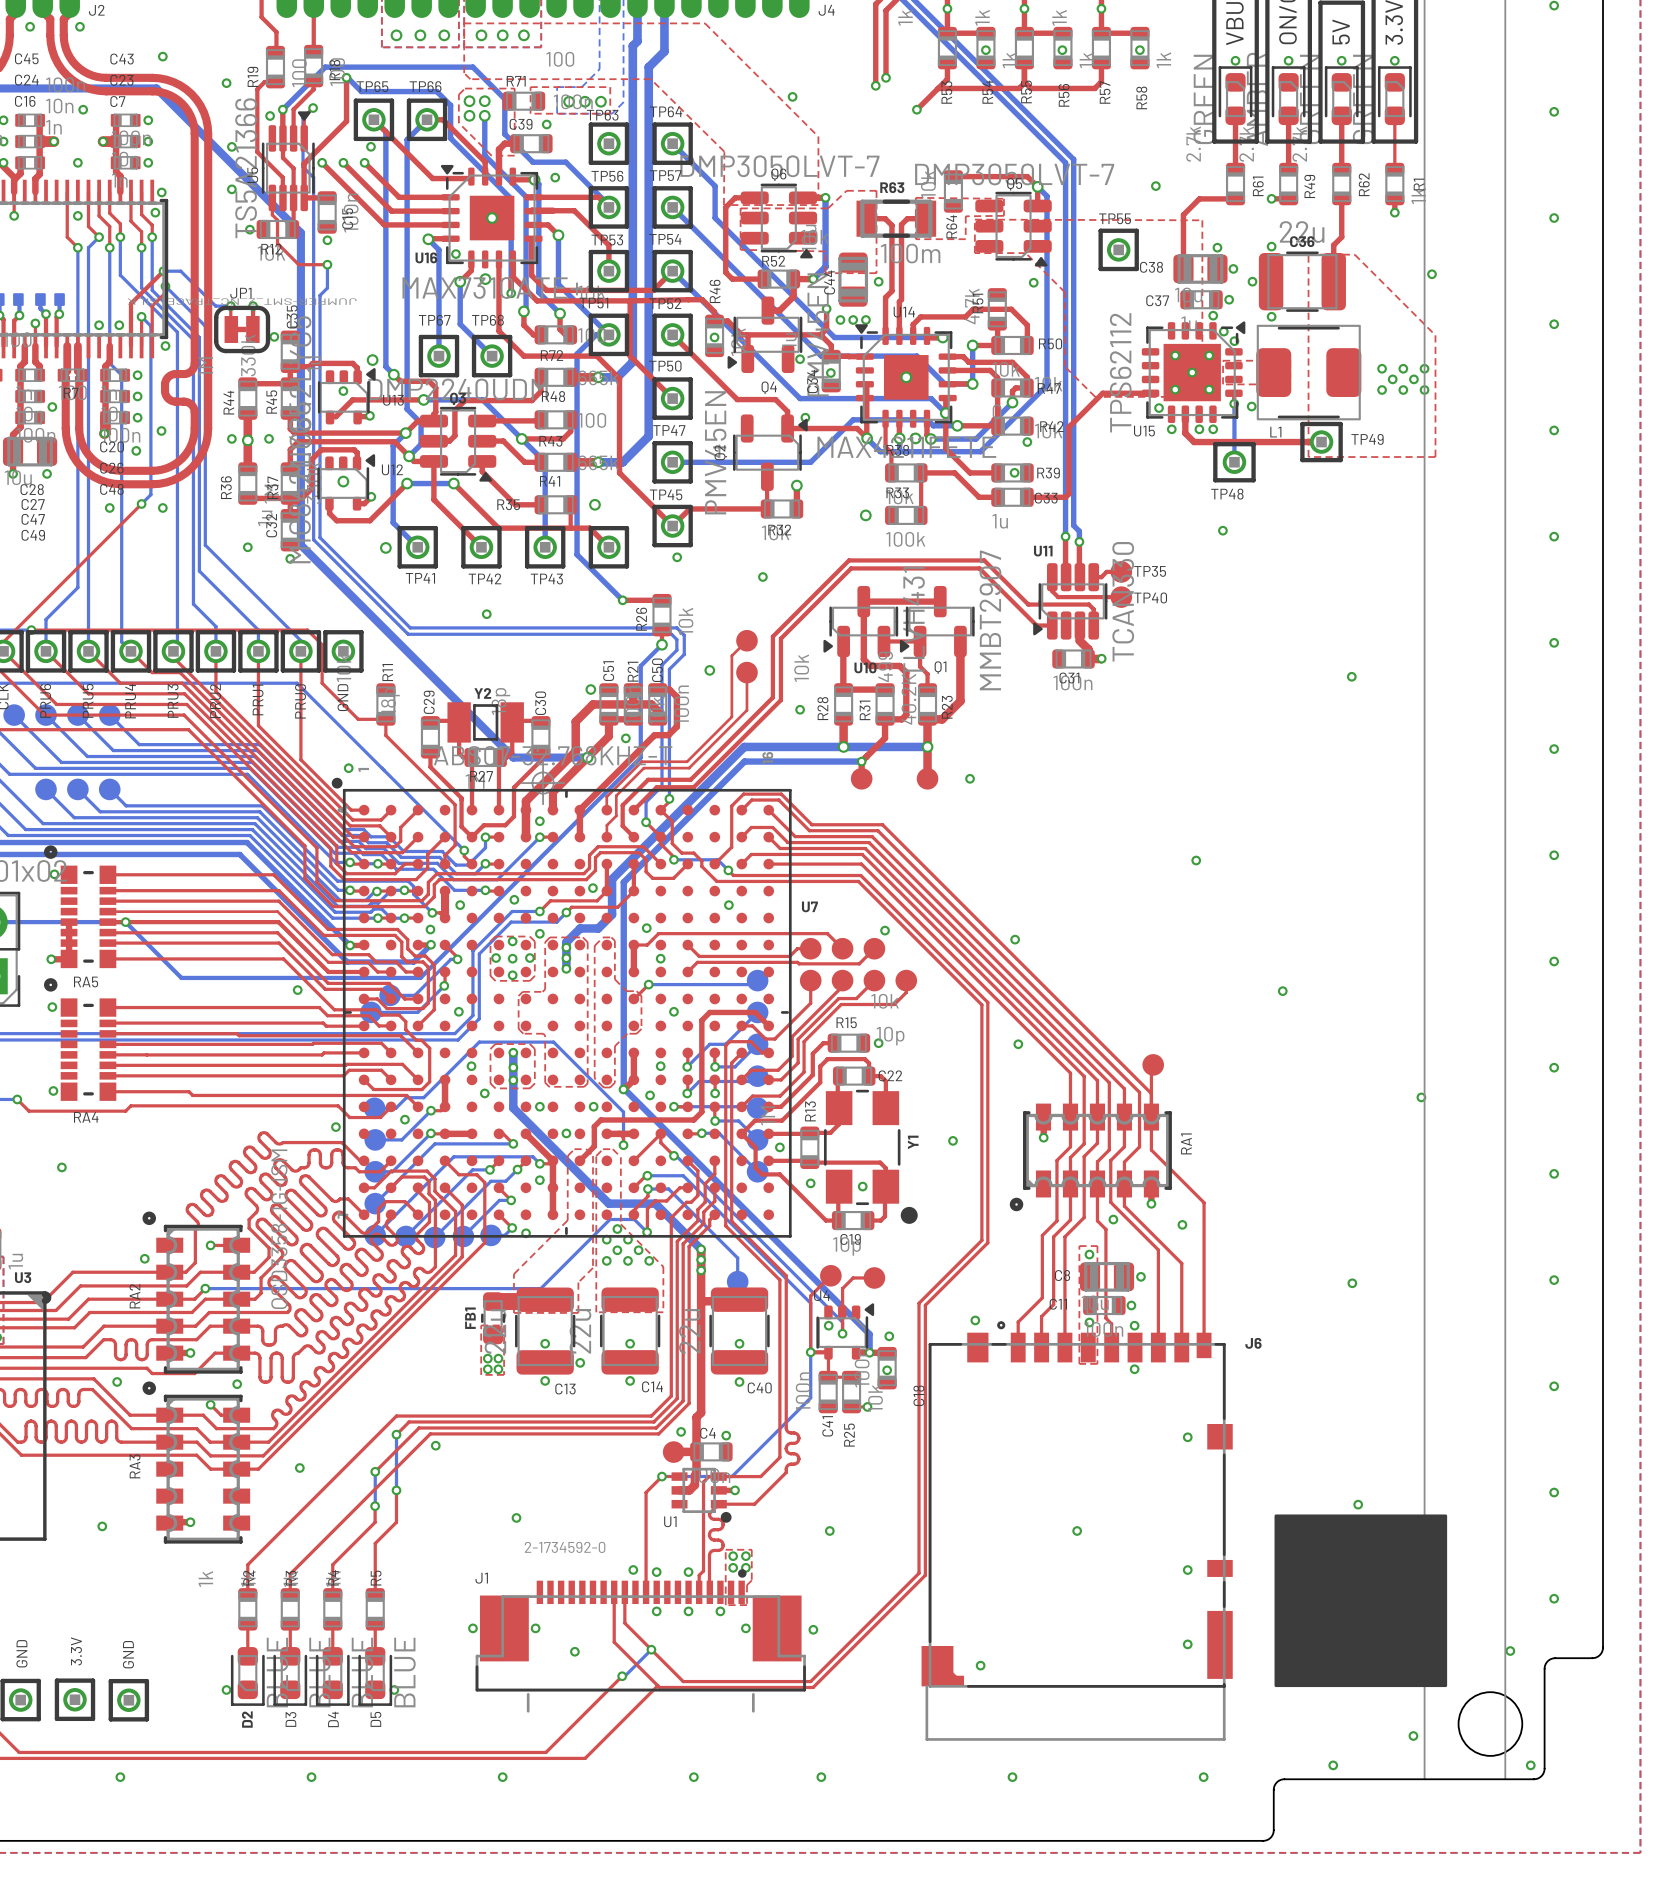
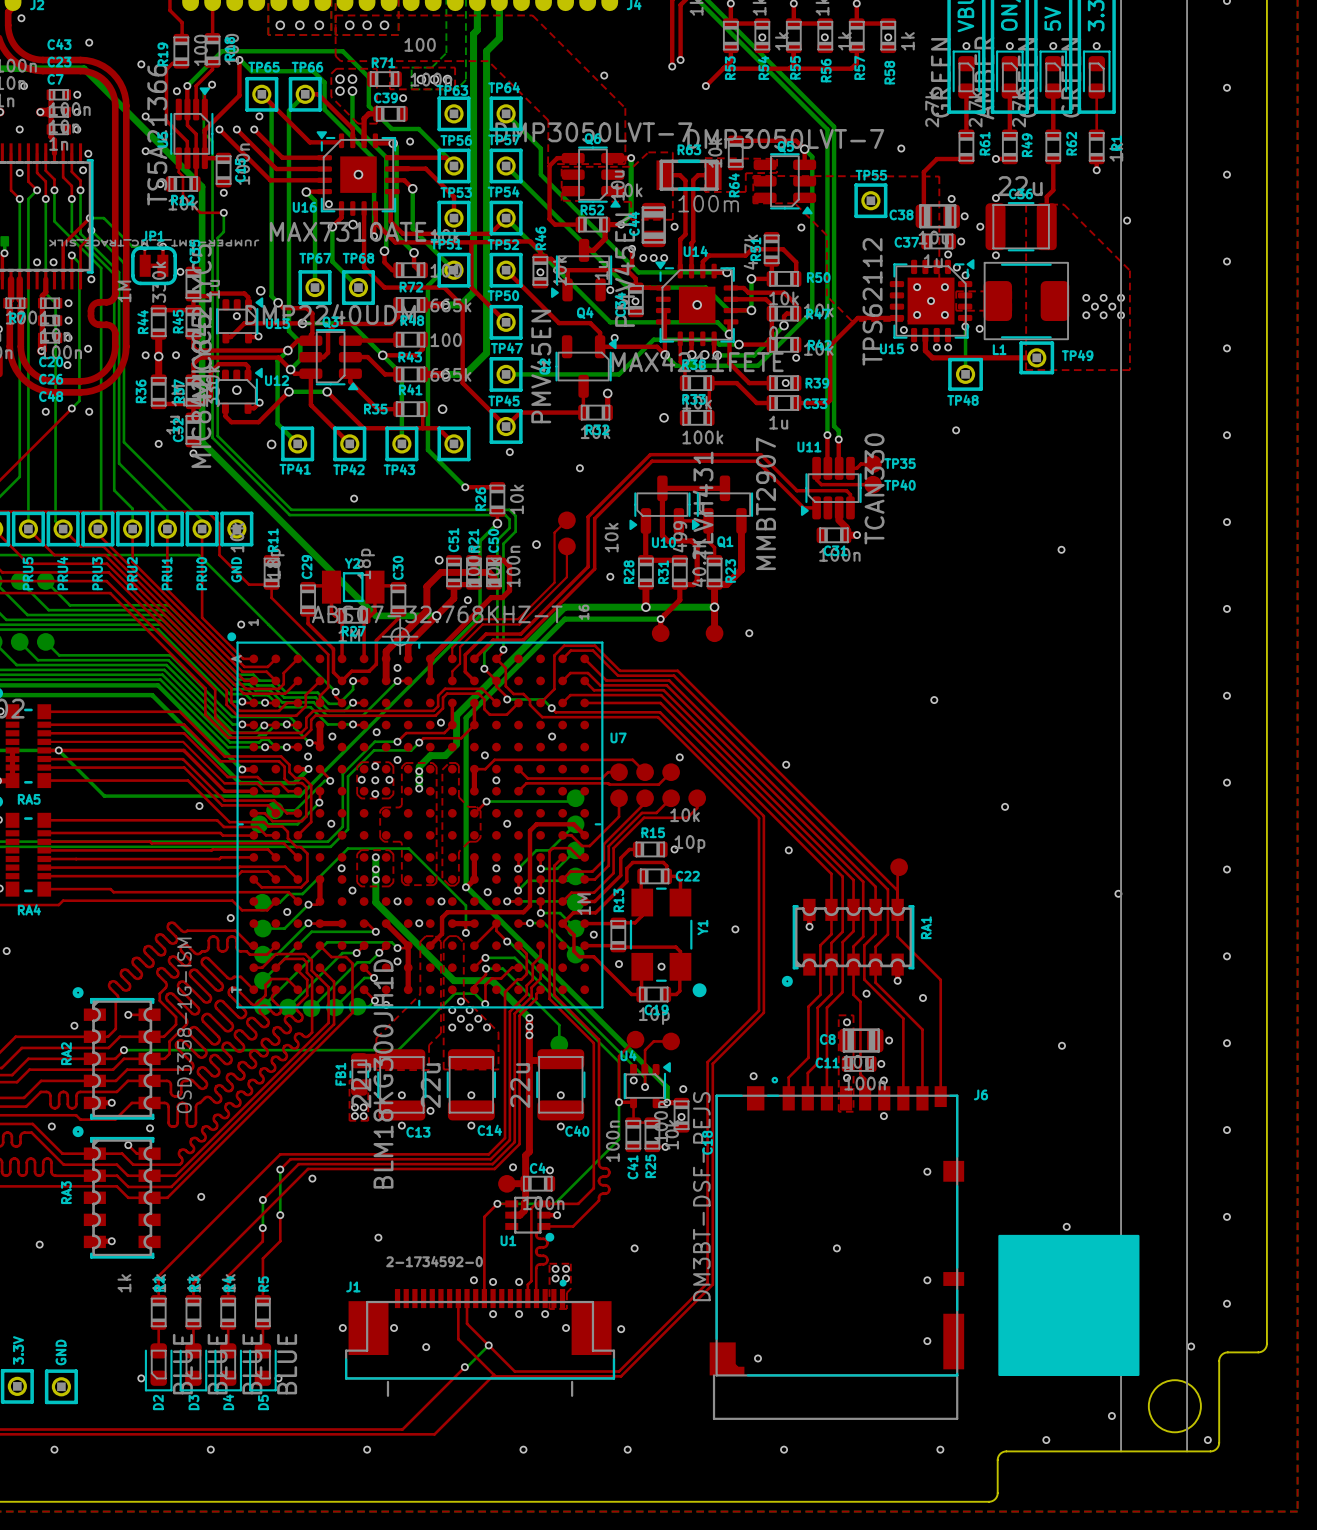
FB1 value: none -> BLM18KG300JH1D (383, 1073)
J6 value: none -> DM3BT-DSF-PEJS (701, 1196)

